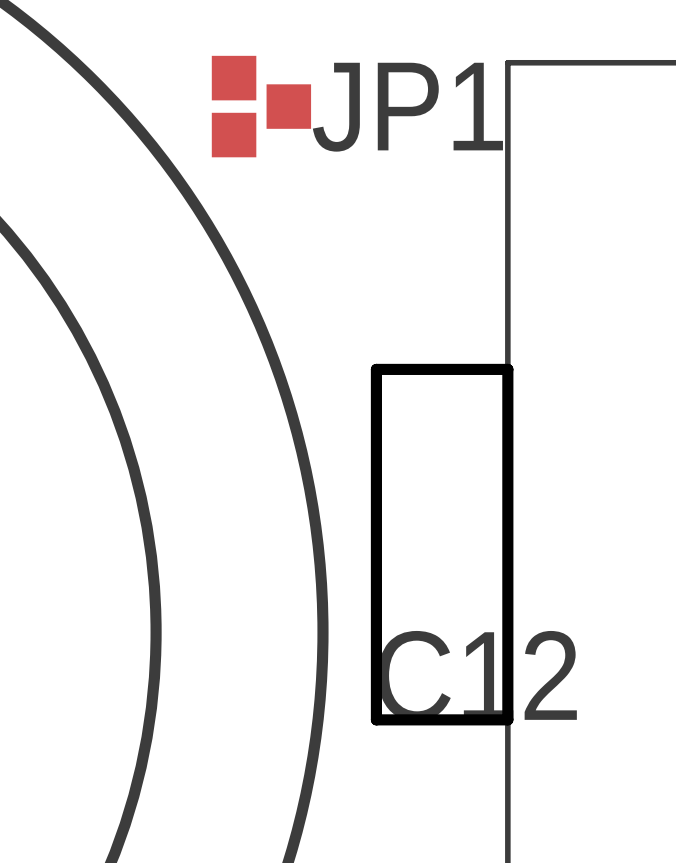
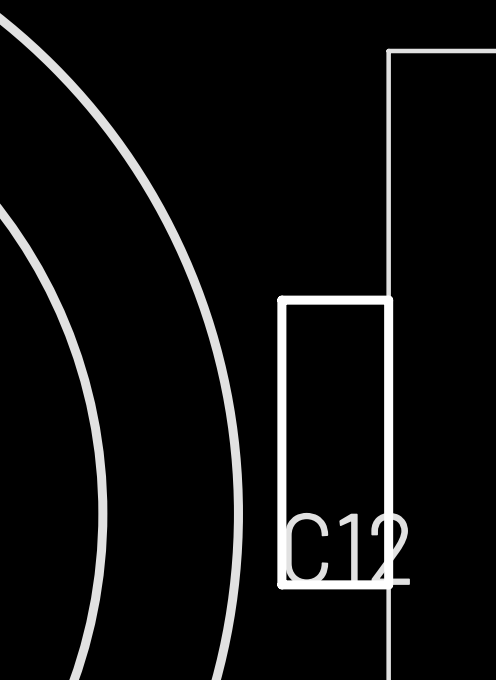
JP1: (261, 106) -> none

